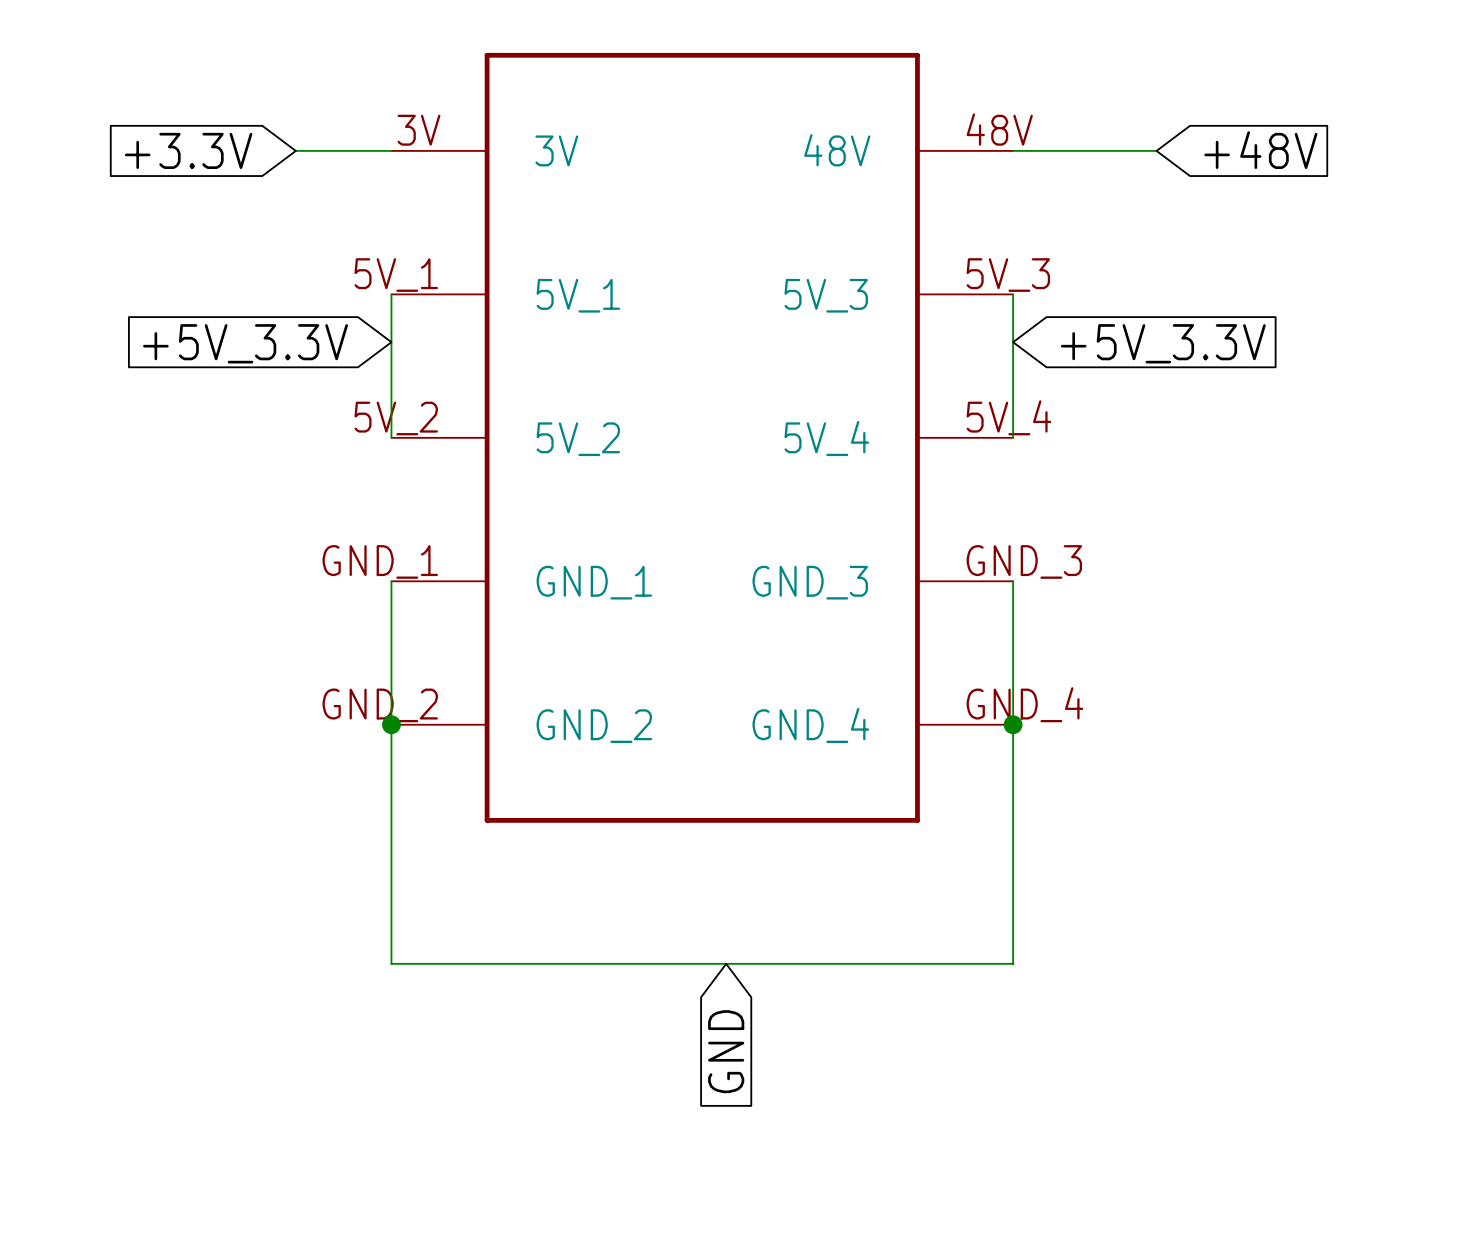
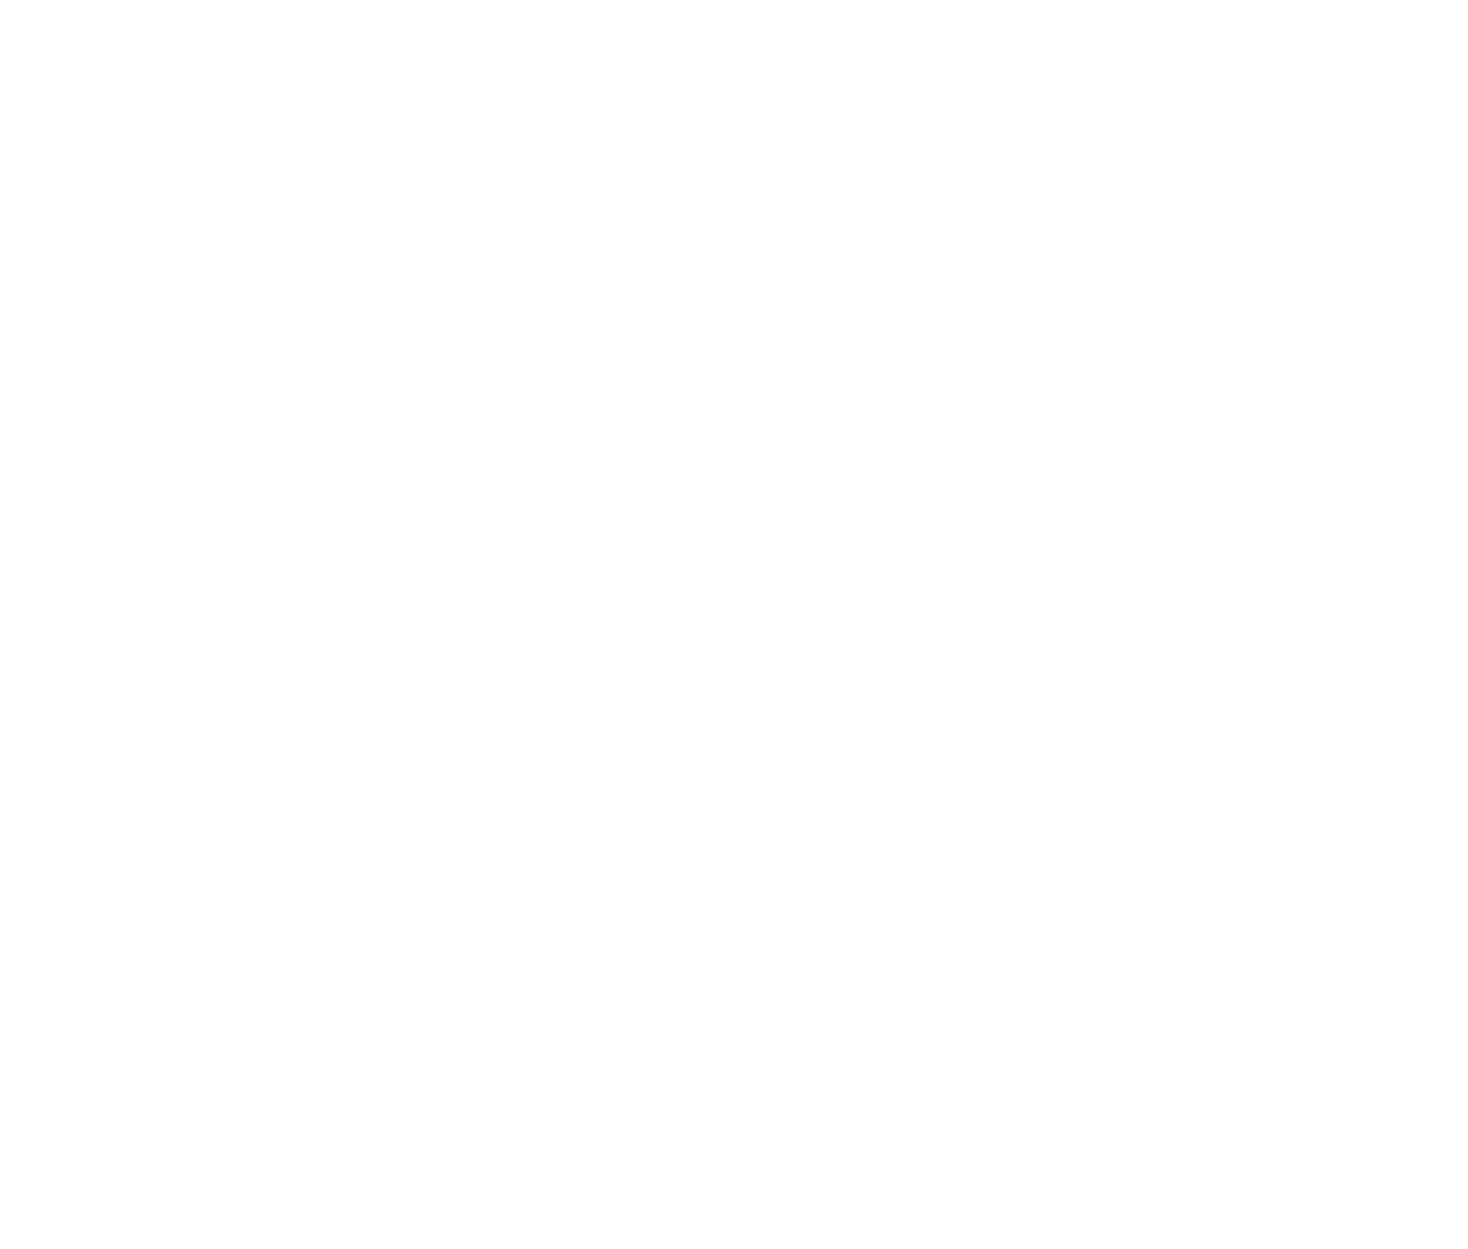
global label: +3.3V (188, 150) -> none
wire: (295, 150) (391, 150) -> none
wire: (1013, 150) (1156, 150) -> none
global label: +48V (1260, 150) -> none
wire: (391, 294) (391, 437) -> none
wire: (1013, 294) (1013, 437) -> none
global label: +5V_3.3V (245, 343) -> none
global label: +5V_3.3V (1163, 343) -> none
part: (702, 437) -> none
wire: (391, 581) (391, 963) (1013, 963) (1013, 581) -> none
junction: (391, 724) -> none
junction: (1013, 724) -> none
global label: GND (726, 1051) -> none

